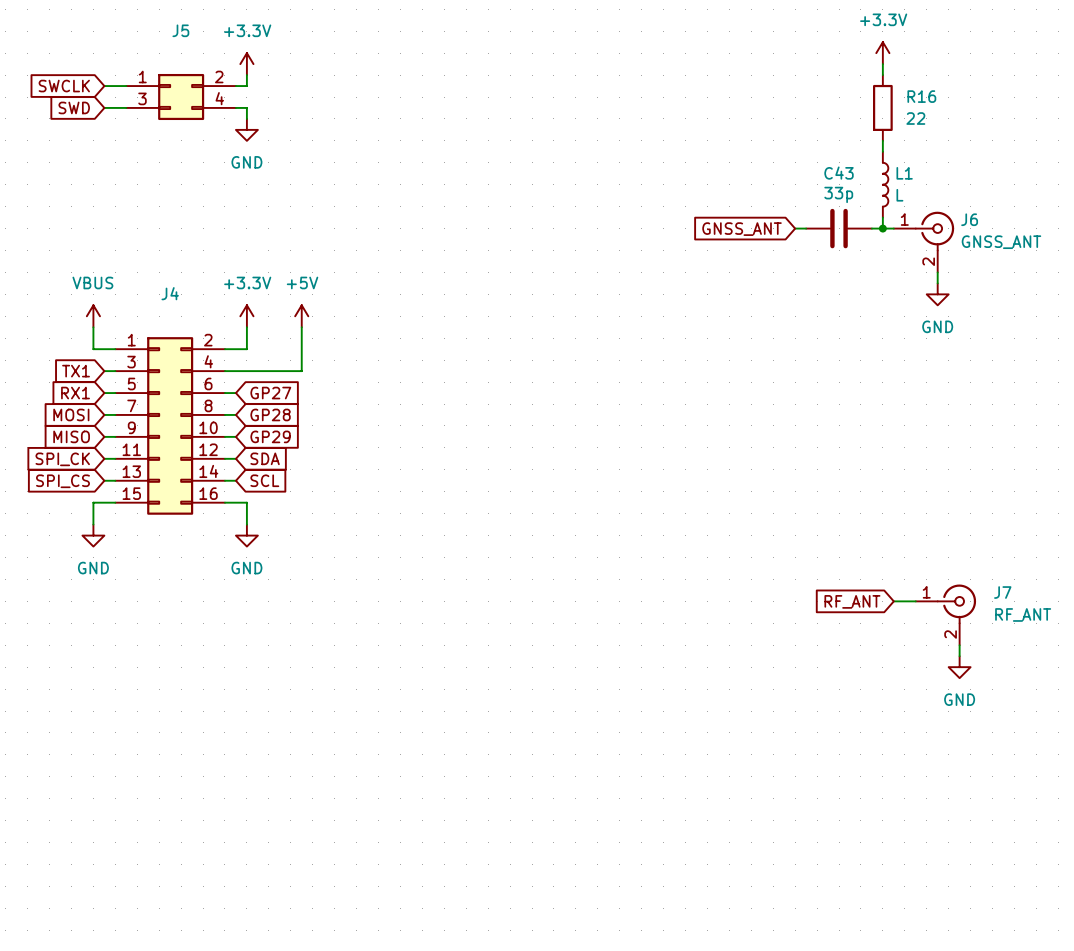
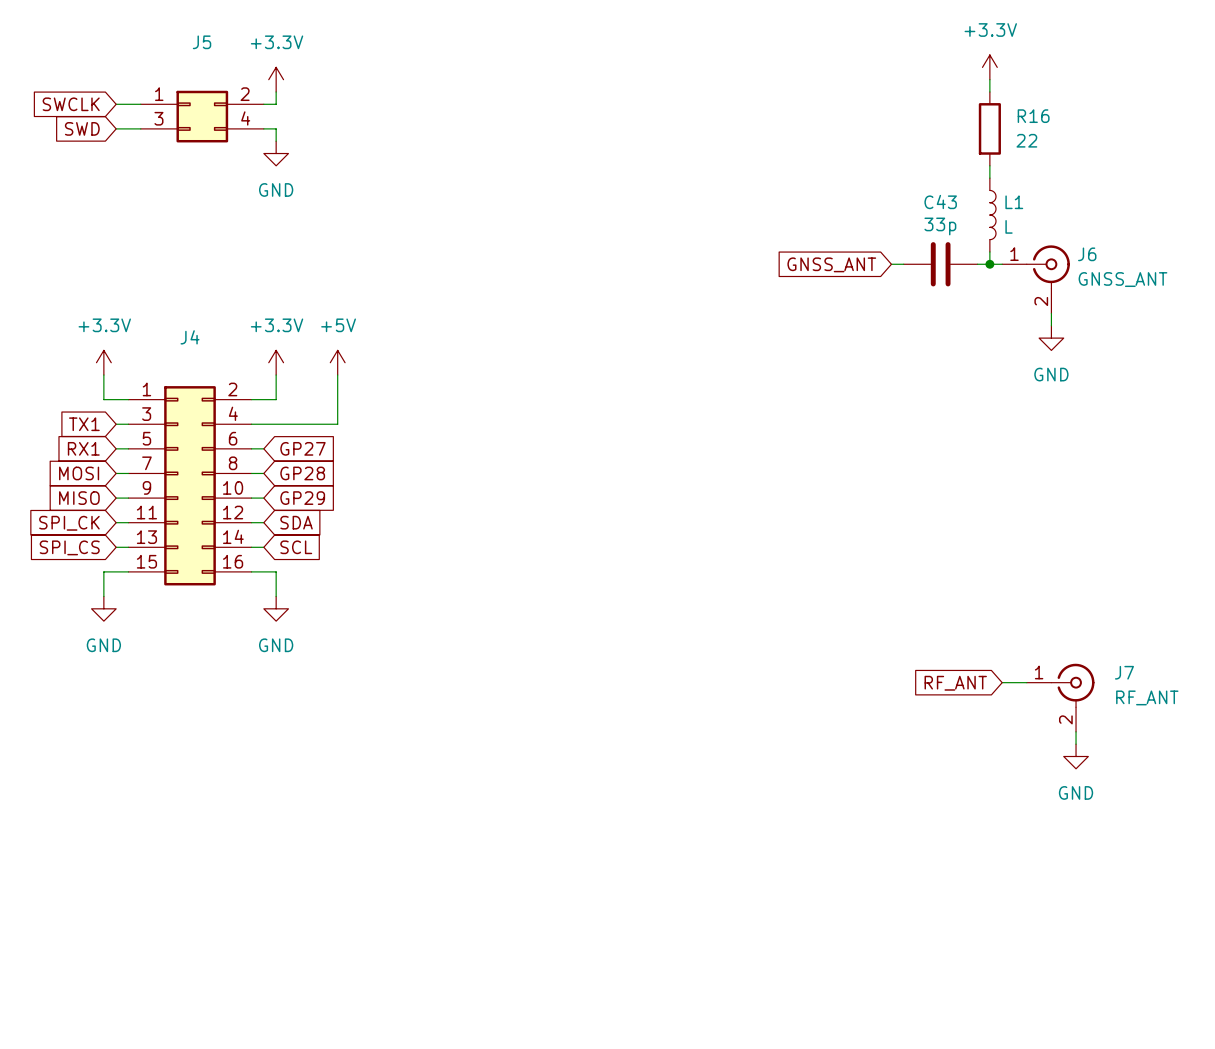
power symbol: VBUS (93, 316) -> +3.3V (103, 362)

